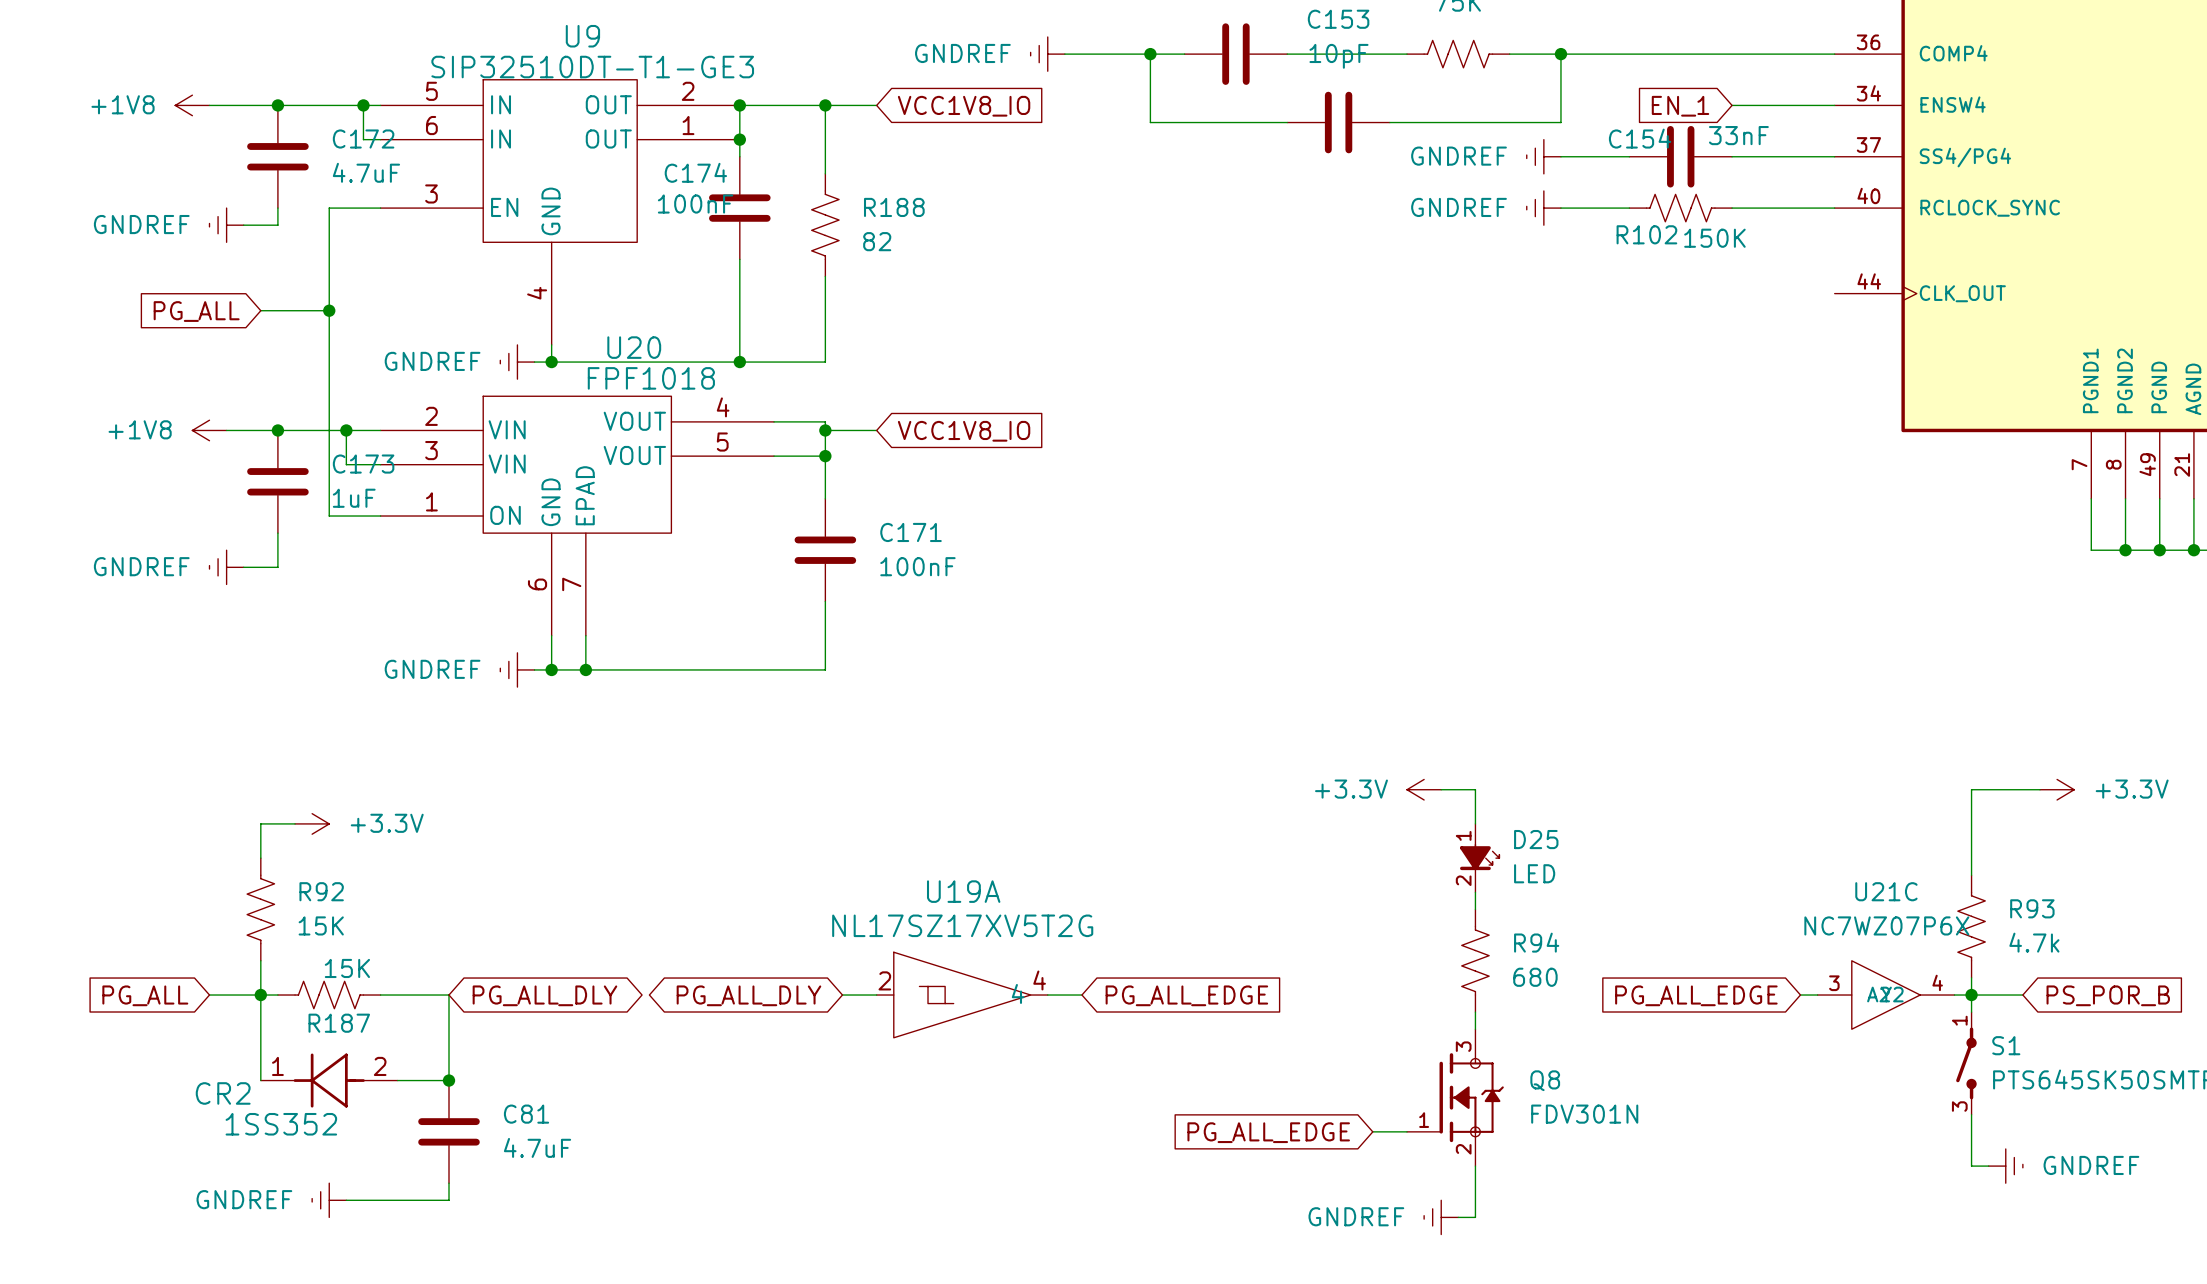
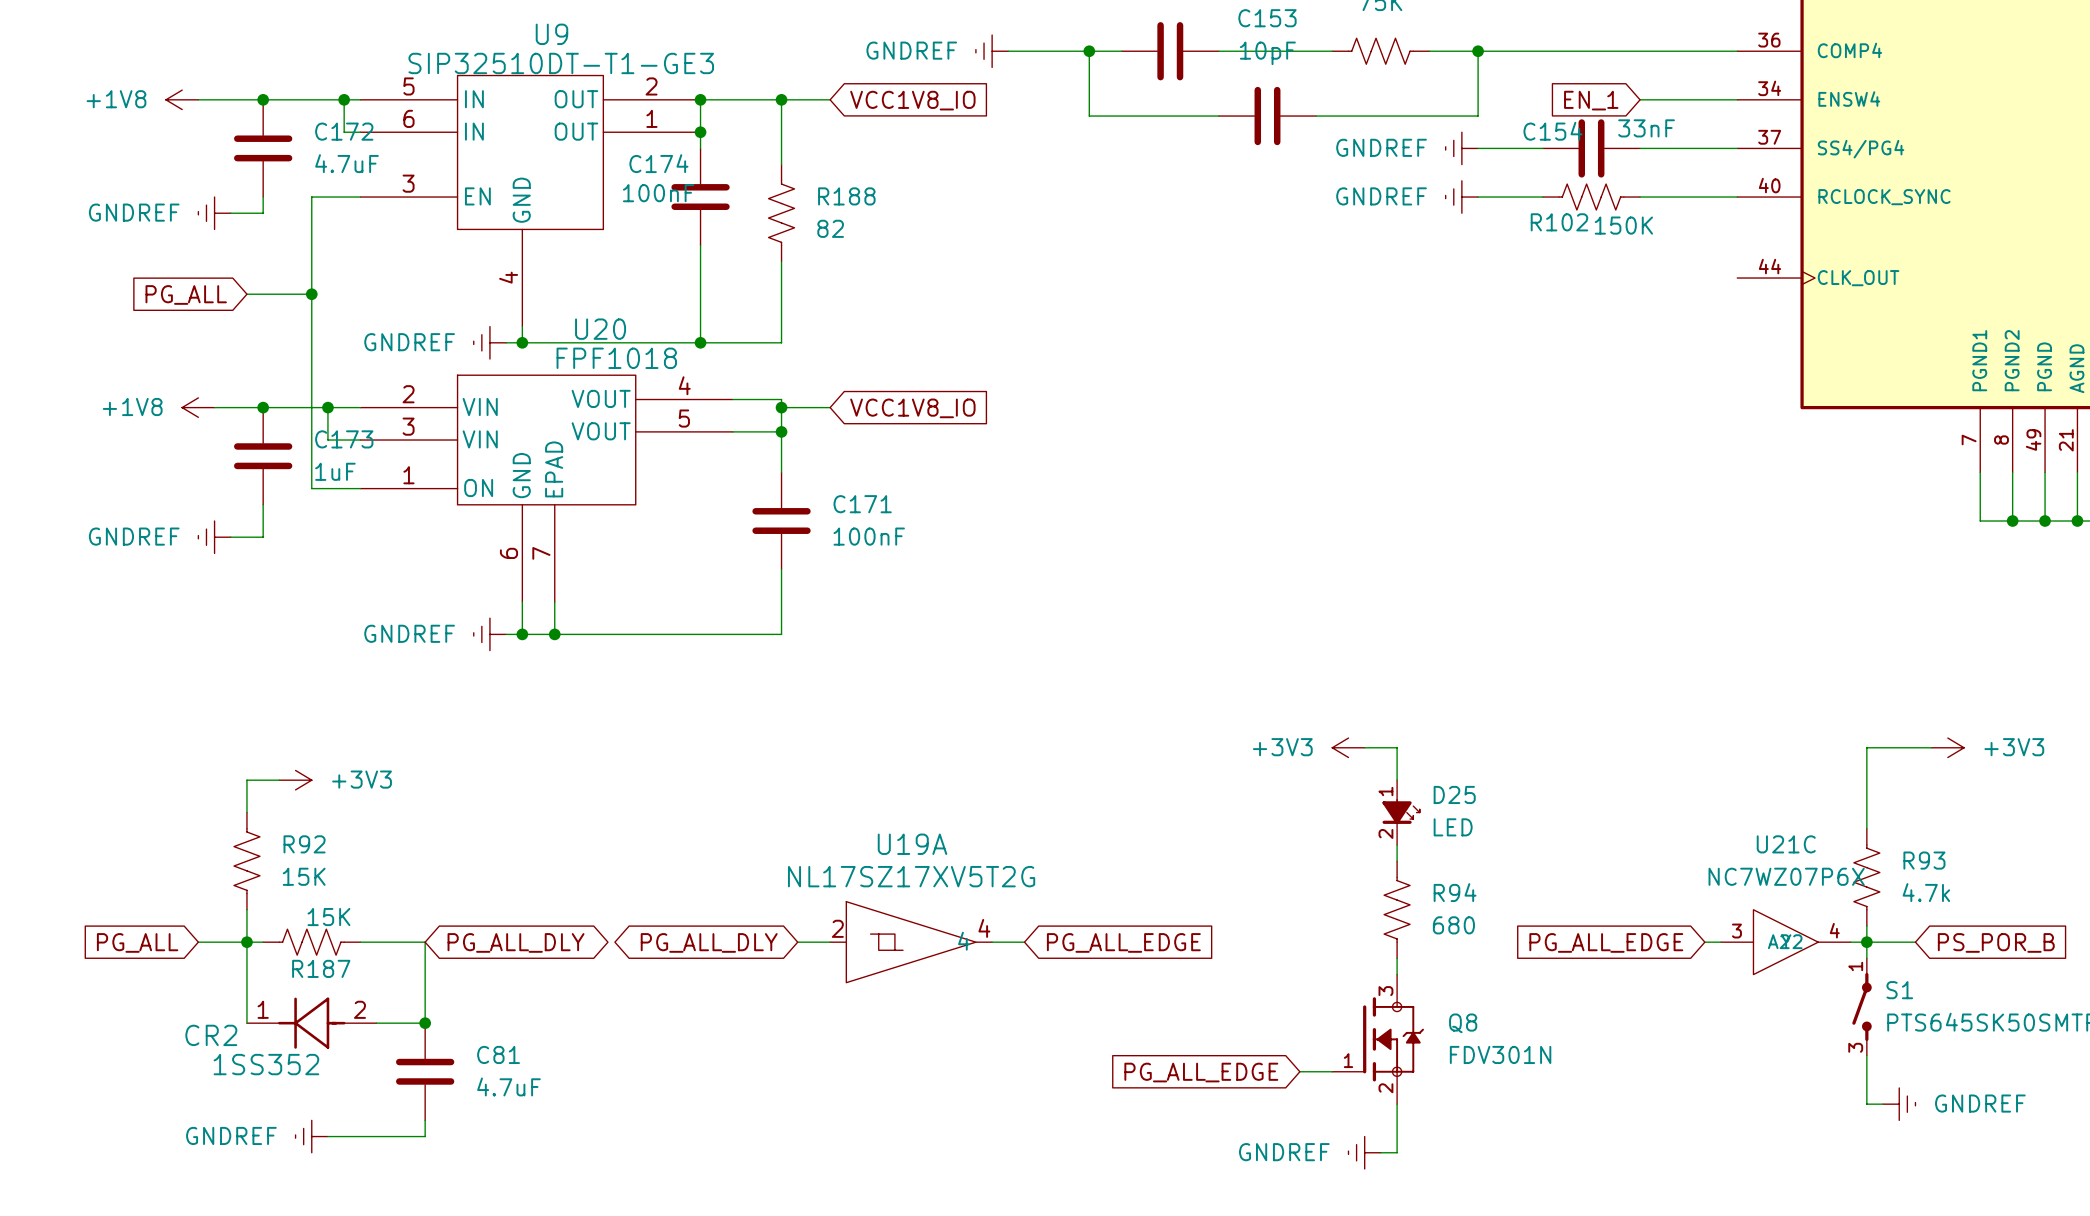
power symbol: +3.3V (1424, 789) -> +3V3 (1348, 747)
power symbol: +3.3V (2057, 789) -> +3V3 (1947, 747)
power symbol: +3.3V (312, 823) -> +3V3 (295, 780)

